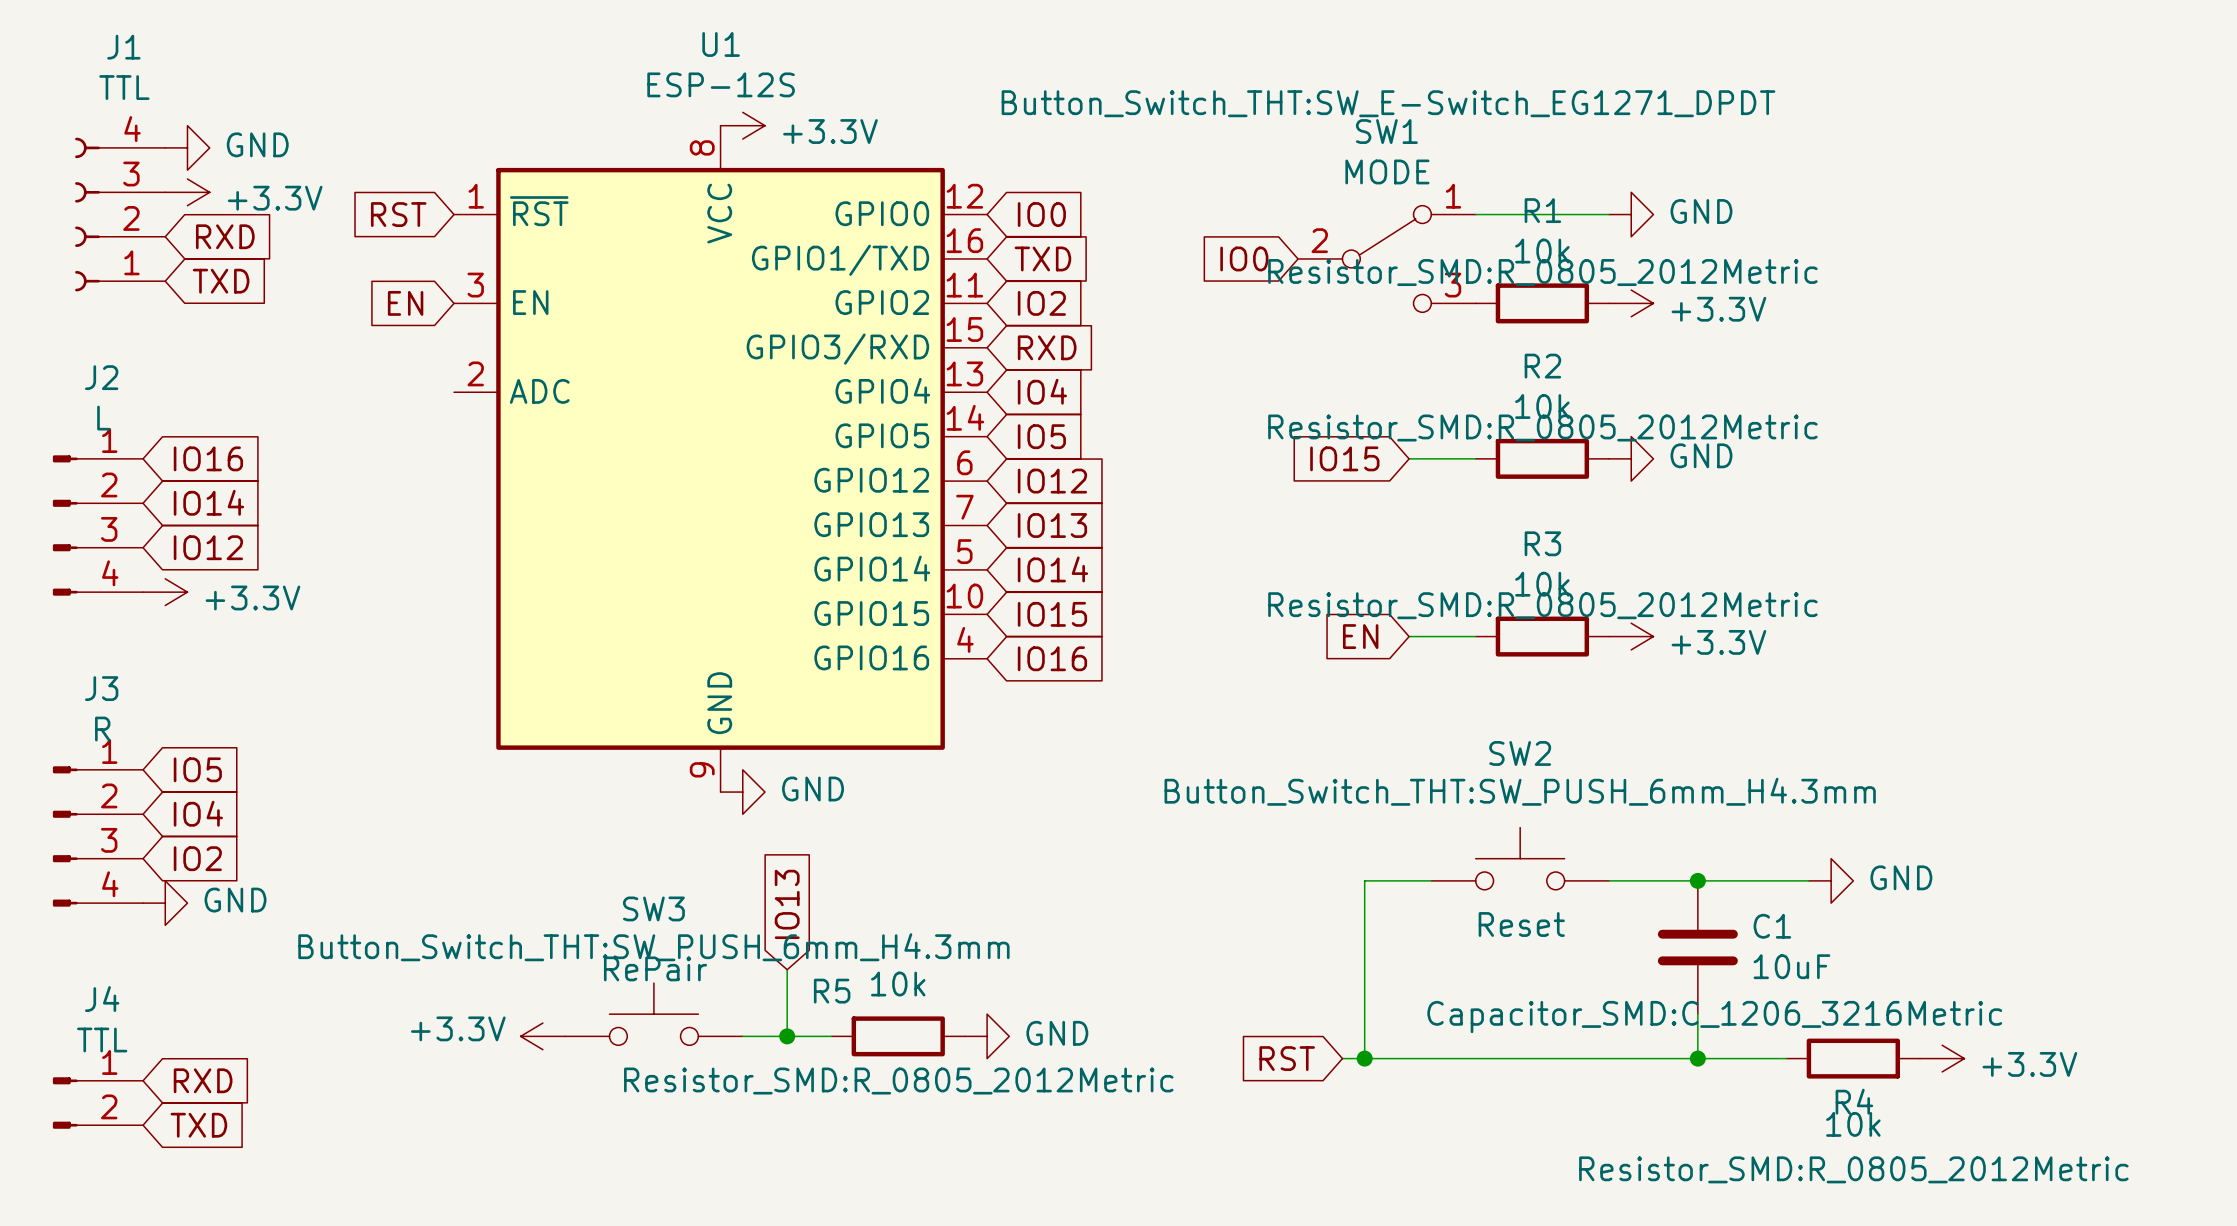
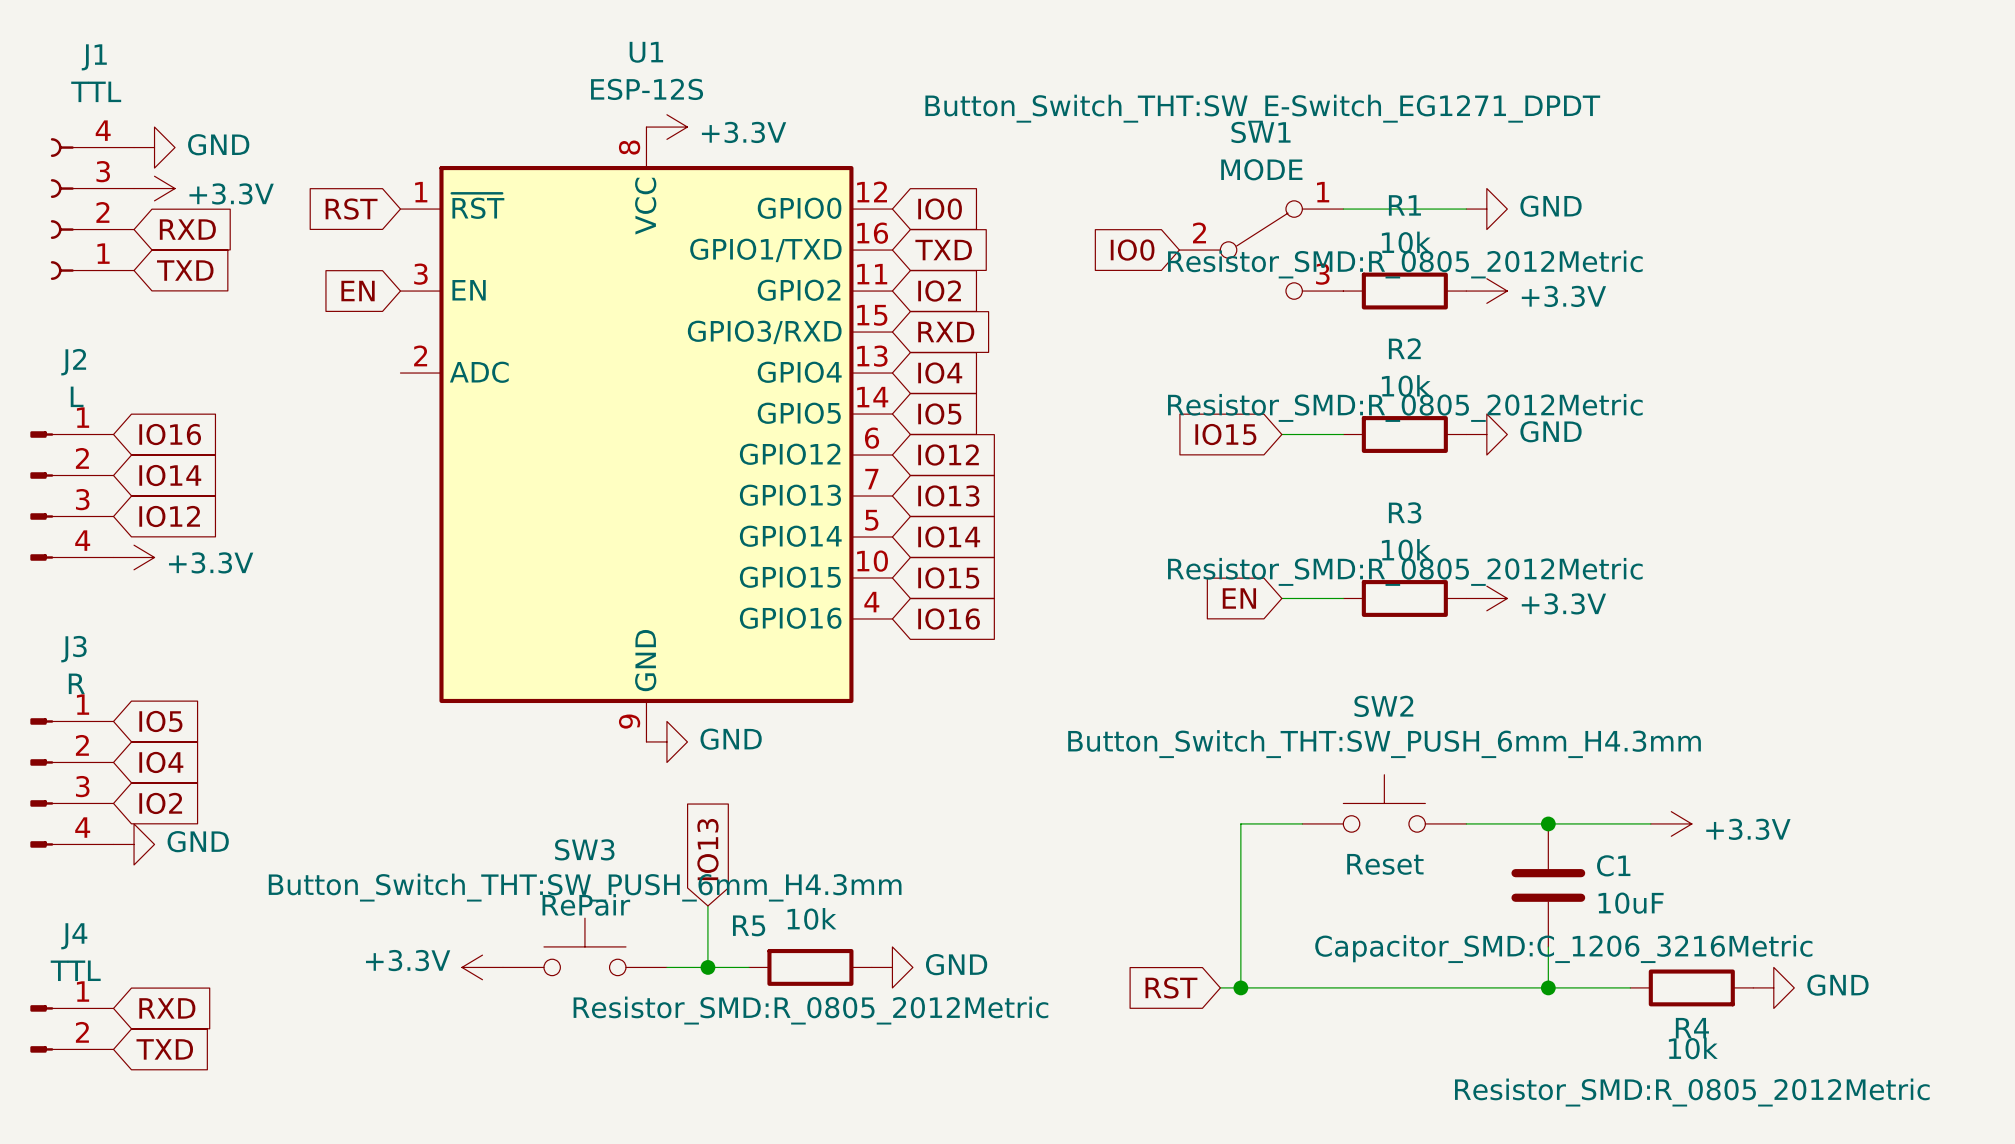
power symbol: GND (1831, 880) -> +3.3V (1671, 823)
power symbol: +3.3V (1942, 1058) -> GND (1773, 987)

